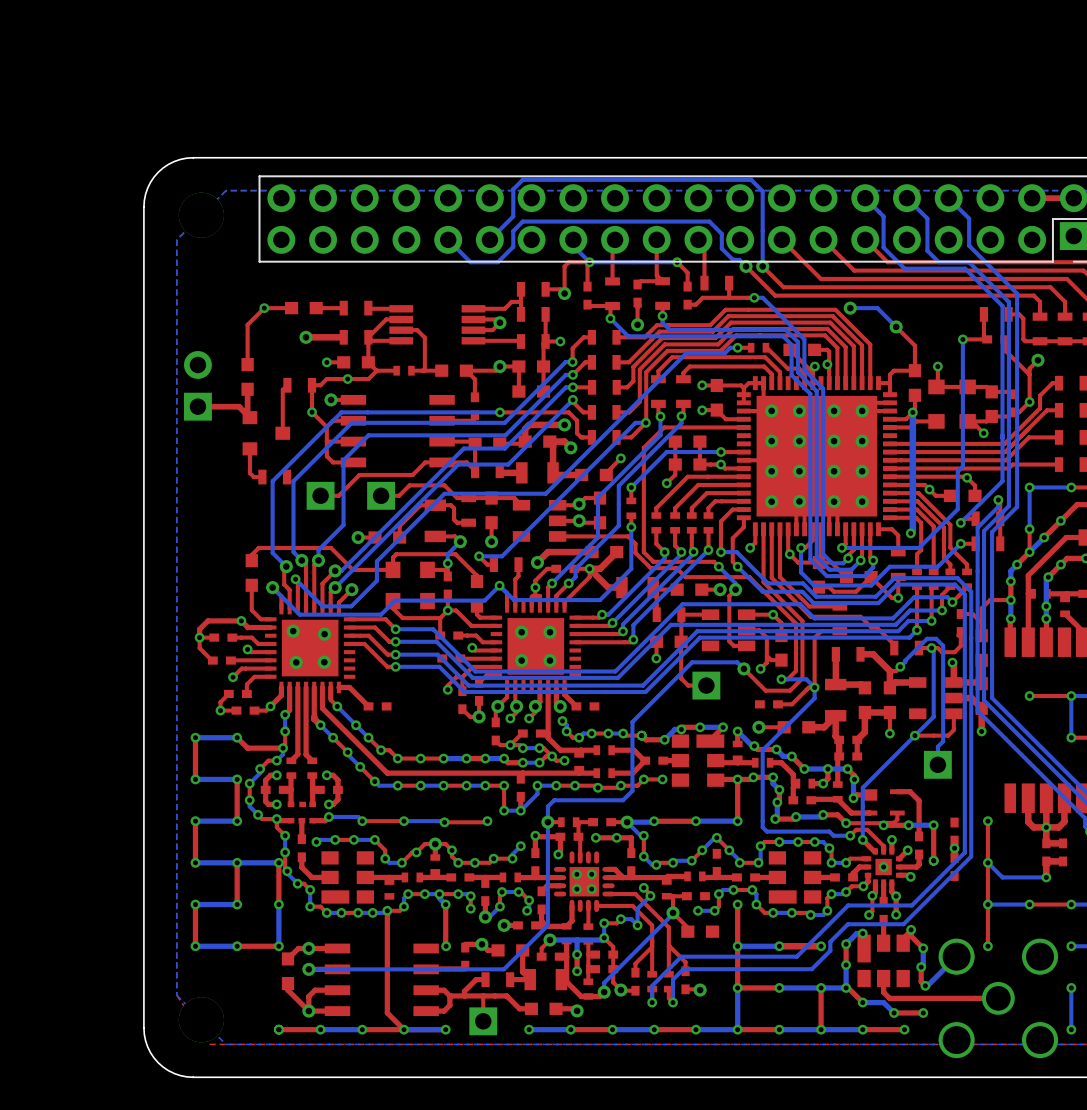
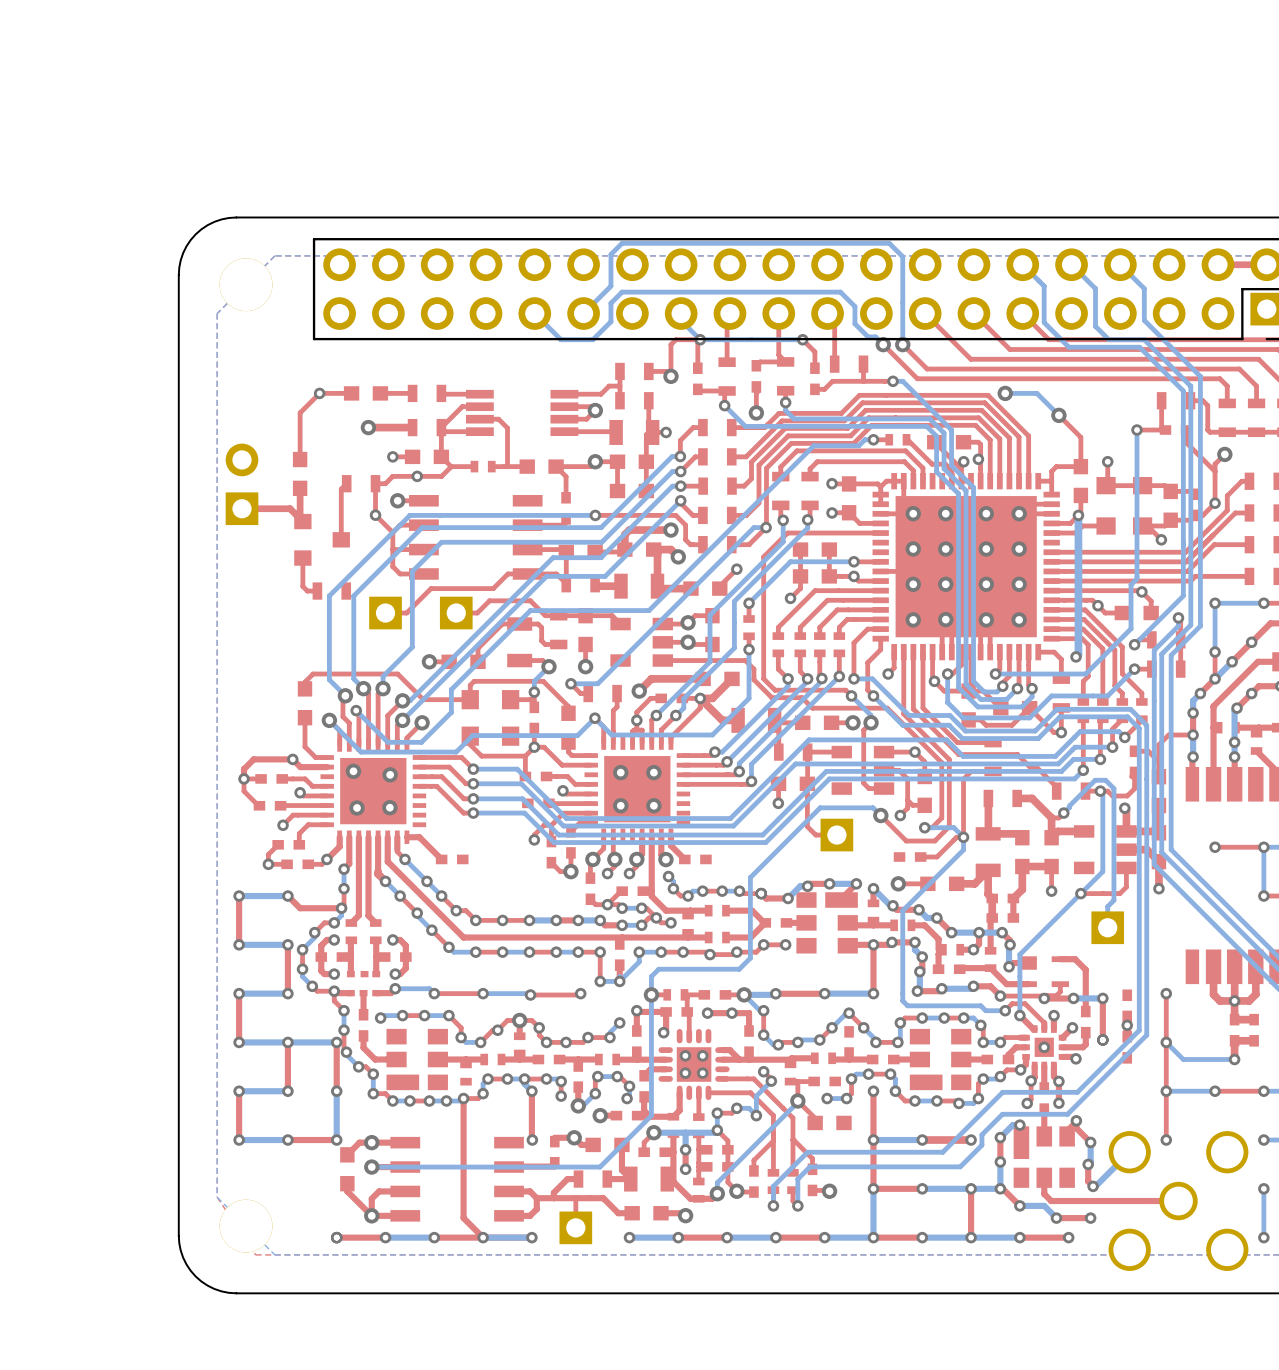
part footprint: [516, 334, 550, 349] -> [609, 419, 660, 445]

